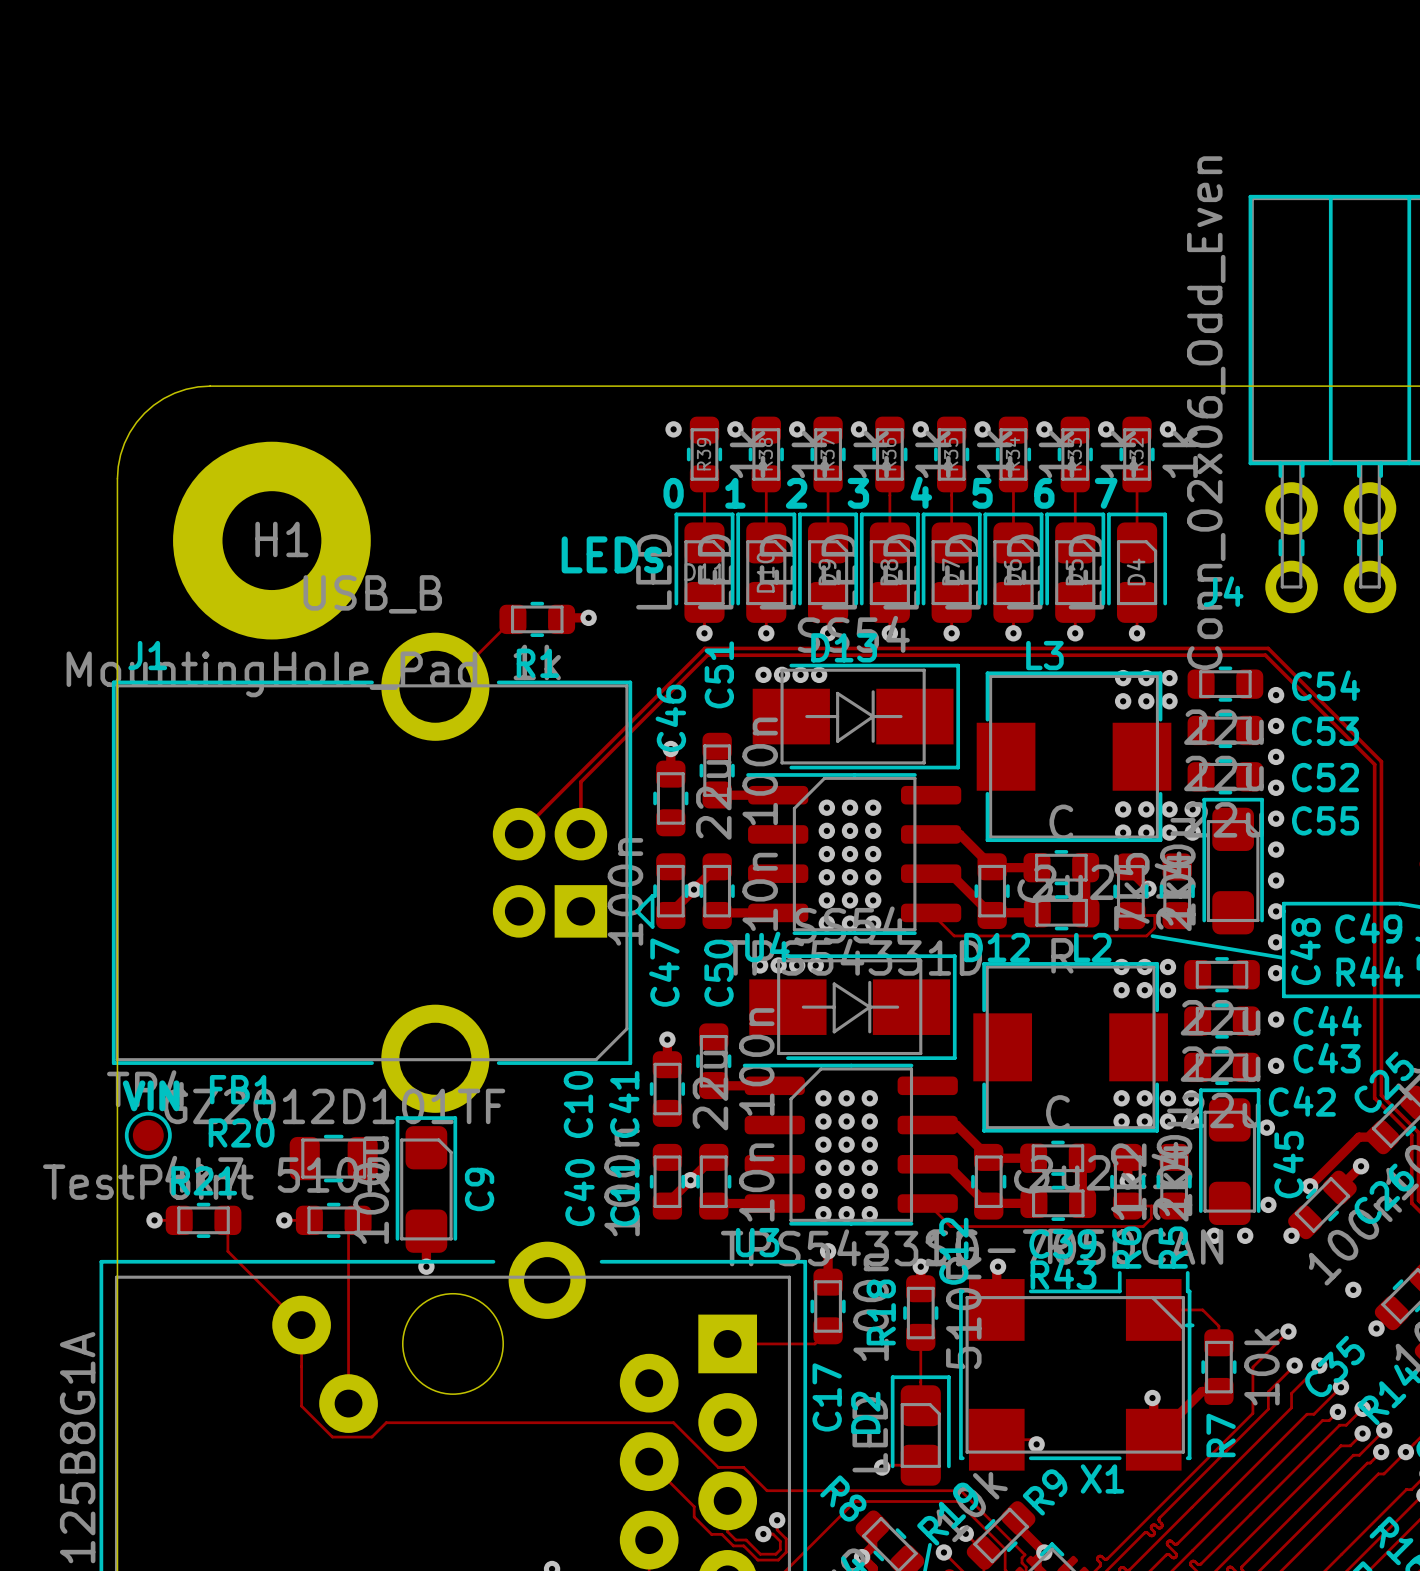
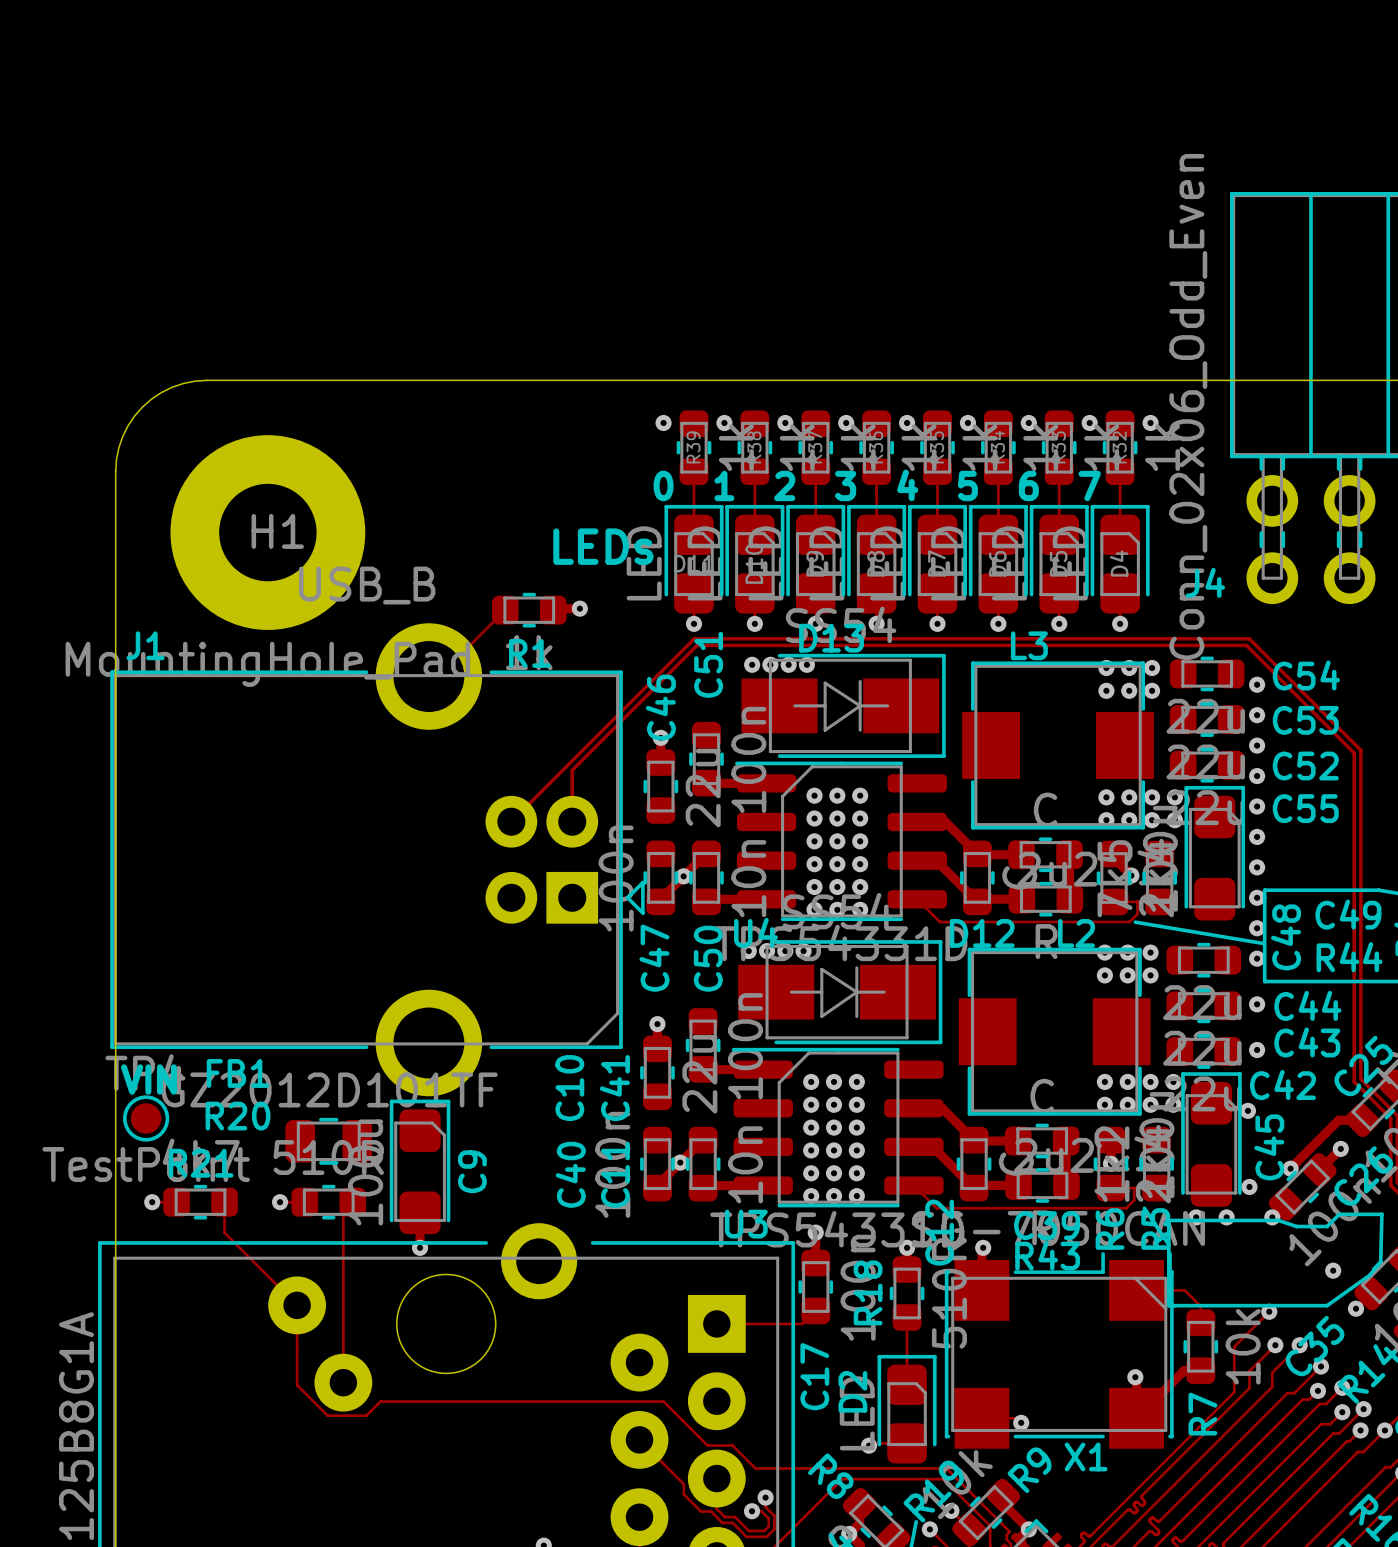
line: none -> (1144, 1208) (1168, 1244)
line: none -> (1168, 1305) (1168, 1220) (1278, 1220) (1296, 1226) (1327, 1226) (1339, 1214) (1381, 1214) (1380, 1262) (1369, 1275) (1327, 1305) (1174, 1305)

